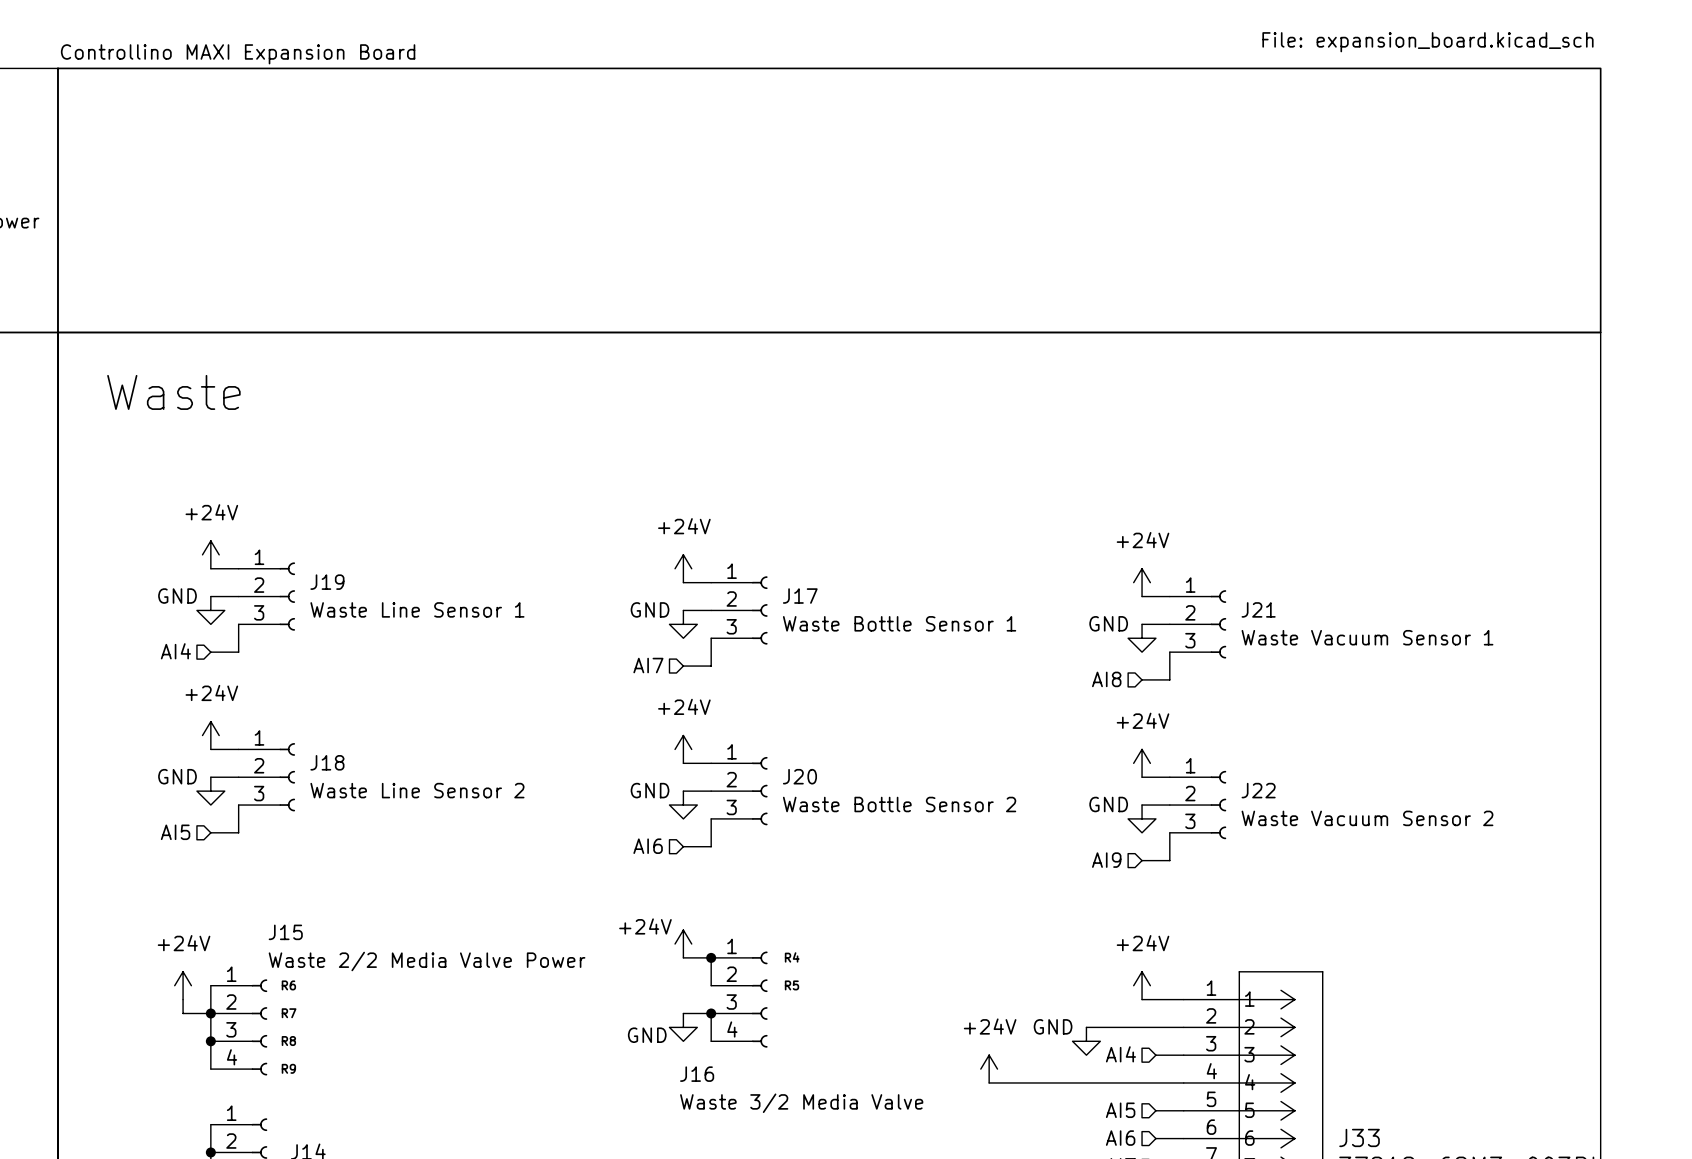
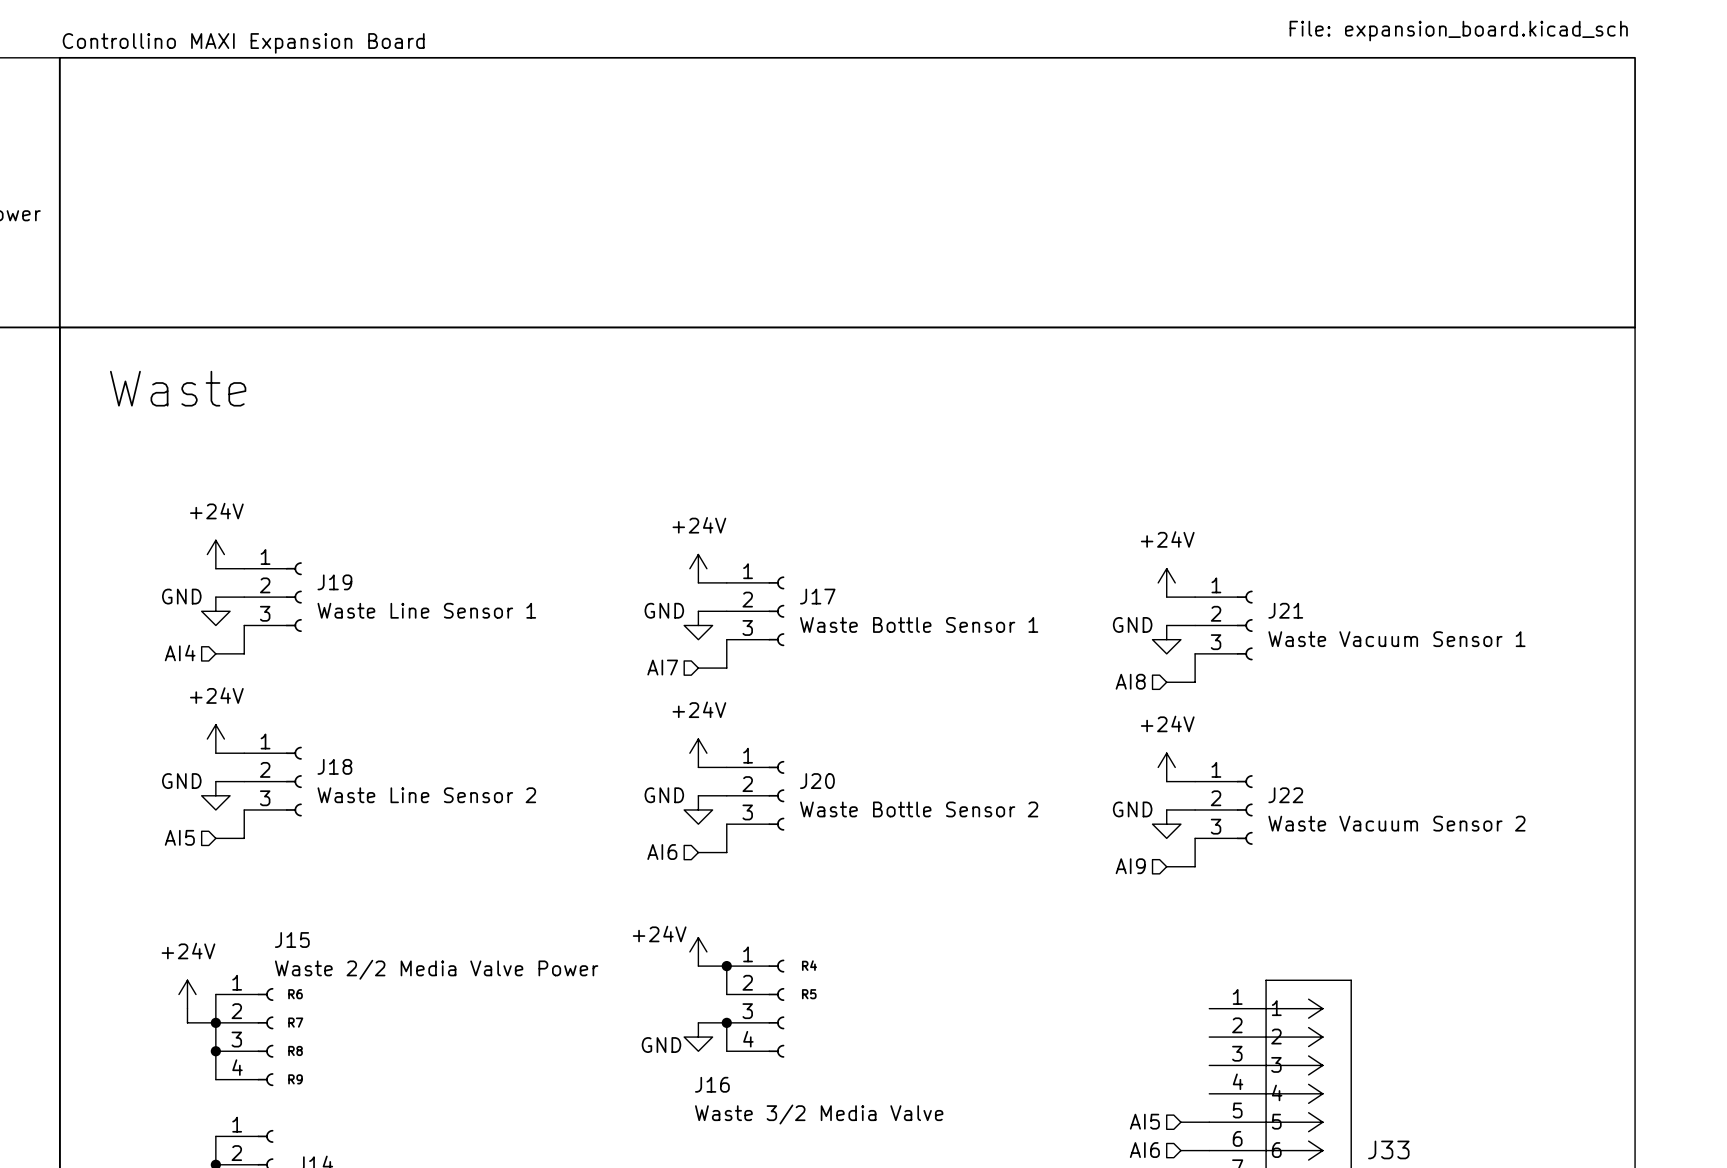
power symbol: +24V (1142, 985) -> none
wire: (1142, 999) (1183, 999) -> none
wire: (1086, 1027) (1183, 1027) -> none
power symbol: GND (1086, 1041) -> none
hierarchical label: AI4 (1120, 1054) -> none
wire: (1155, 1055) (1183, 1055) -> none
power symbol: +24V (989, 1069) -> none
wire: (989, 1082) (1183, 1082) -> none

